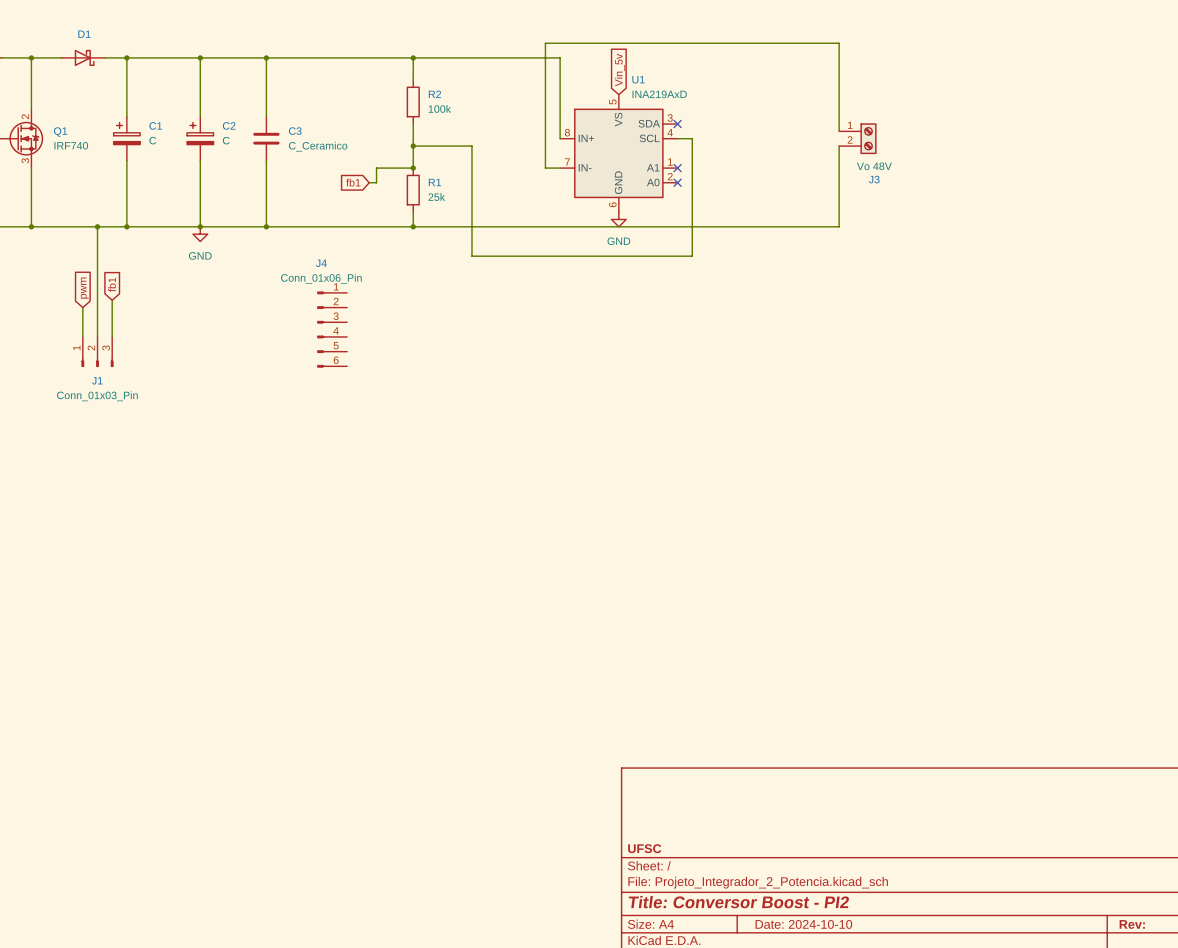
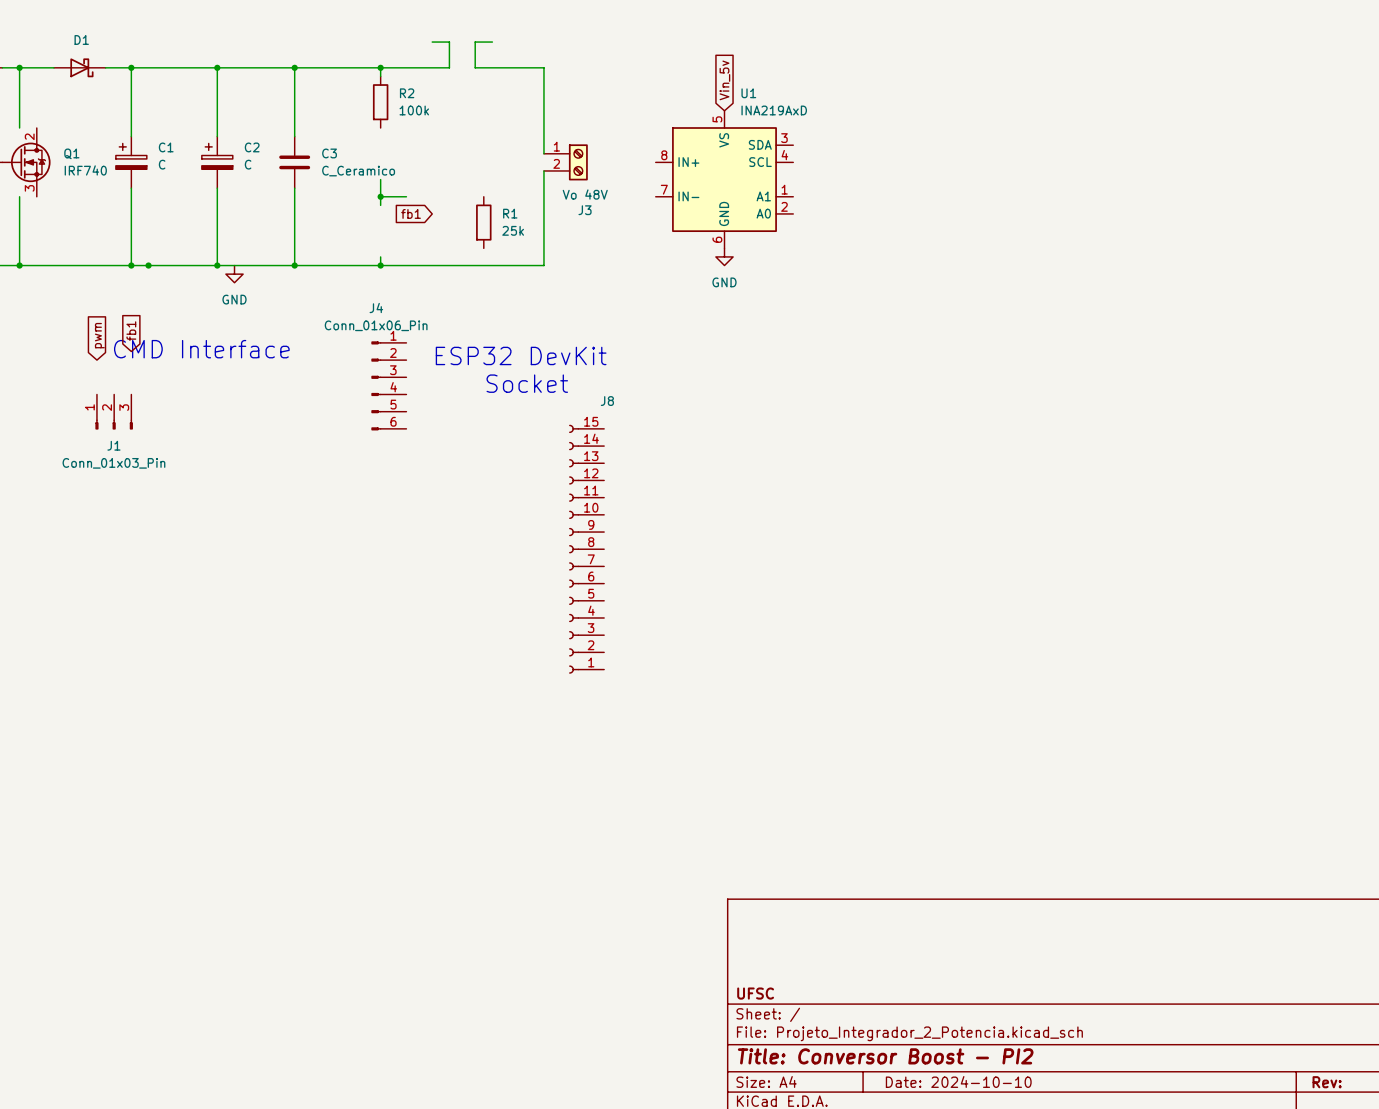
wire: none -> (492, 42) (475, 42) (475, 67)
wire: (31, 57) (31, 109) -> (19, 67) (19, 128)
junction position: (31, 57) -> (19, 67)
D1 position: (82, 57) -> (79, 67)
wire: (126, 57) (126, 116) -> (131, 67) (131, 136)
junction position: (126, 57) -> (131, 67)
wire: (200, 57) (200, 116) -> (217, 67) (217, 136)
junction position: (200, 57) -> (217, 67)
wire: (266, 57) (266, 116) -> (294, 67) (294, 136)
junction position: (266, 57) -> (294, 67)
wire: none -> (380, 67) (380, 76)
junction: none -> (380, 67)
wire: (383, 57) (405, 57) -> (449, 67) (449, 42) (432, 42)
wire: (413, 57) (413, 79) -> (380, 179) (380, 205)
junction: (413, 57) -> none
wire: (464, 57) (560, 57) (560, 138) -> (543, 67) (543, 153)
R2 position: (413, 101) -> (380, 102)
wire: (413, 124) (413, 168) (376, 168) (376, 182) (369, 182) -> none
no-connect mark: (677, 124) -> none
wire: (839, 131) (839, 43) (545, 43) (545, 168) (560, 168) -> none
C1 position: (126, 138) -> (131, 162)
C2 position: (200, 138) -> (217, 162)
C3 position: (266, 138) -> (294, 162)
wire: (677, 138) (692, 138) (692, 256) (471, 256) (471, 146) (413, 146) -> none
J3 position: (857, 138) -> (565, 162)
junction: (413, 146) -> none
wire: (839, 146) (839, 226) (464, 226) -> (543, 170) (543, 265)
wire: (126, 160) (126, 226) -> (131, 188) (131, 265)
wire: (200, 160) (200, 226) -> (217, 188) (217, 265)
wire: (266, 160) (266, 226) -> (294, 188) (294, 265)
wire: (31, 168) (31, 226) -> (19, 196) (19, 265)
wire: none -> (380, 196) (406, 196)
junction: none -> (380, 196)
junction: (413, 168) -> none
no-connect mark: (677, 168) -> none
no-connect mark: (677, 182) -> none
wire: (413, 212) (413, 226) -> none
wire: none -> (380, 256) (380, 265)
junction position: (31, 226) -> (19, 265)
wire: (97, 226) (97, 336) -> none
junction position: (97, 226) -> (131, 265)
junction position: (200, 226) -> (217, 265)
junction position: (266, 226) -> (294, 265)
junction: none -> (380, 265)
junction: (413, 226) -> none
text: none -> CMD Interface (201, 349)
wire: (112, 300) (112, 336) -> none
text: none -> ESP32 DevKit (521, 355)
wire: (82, 307) (82, 336) -> none
text: none -> Socket (527, 383)
J8: none -> (586, 549)

